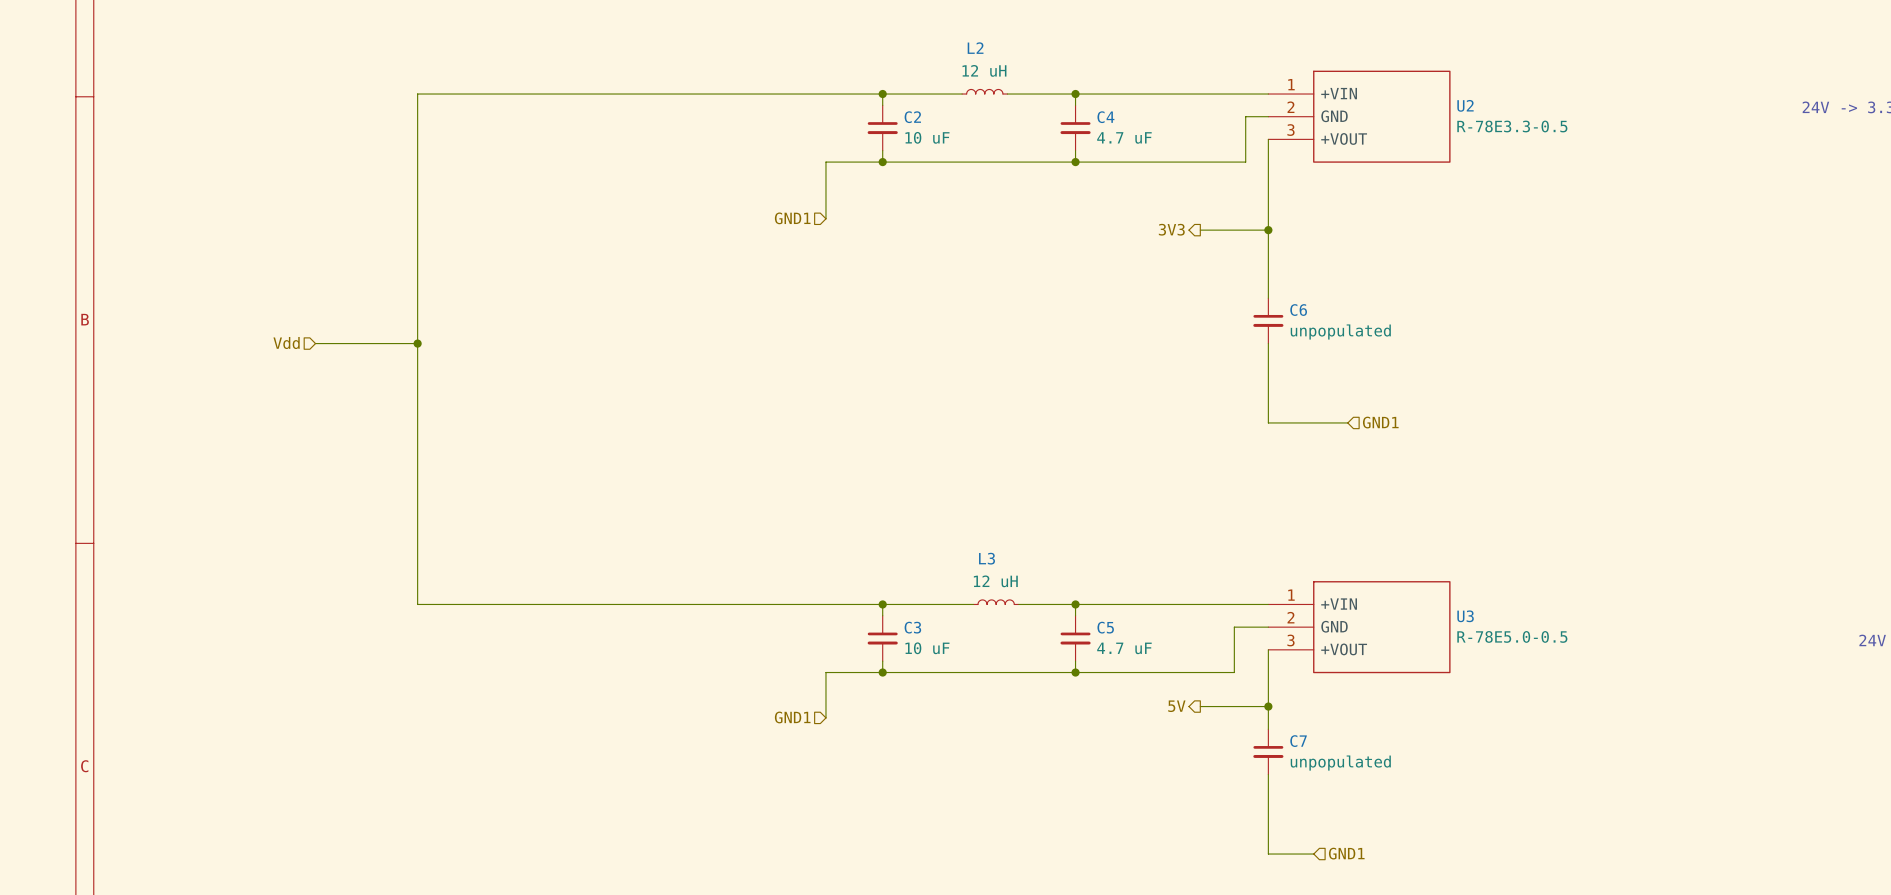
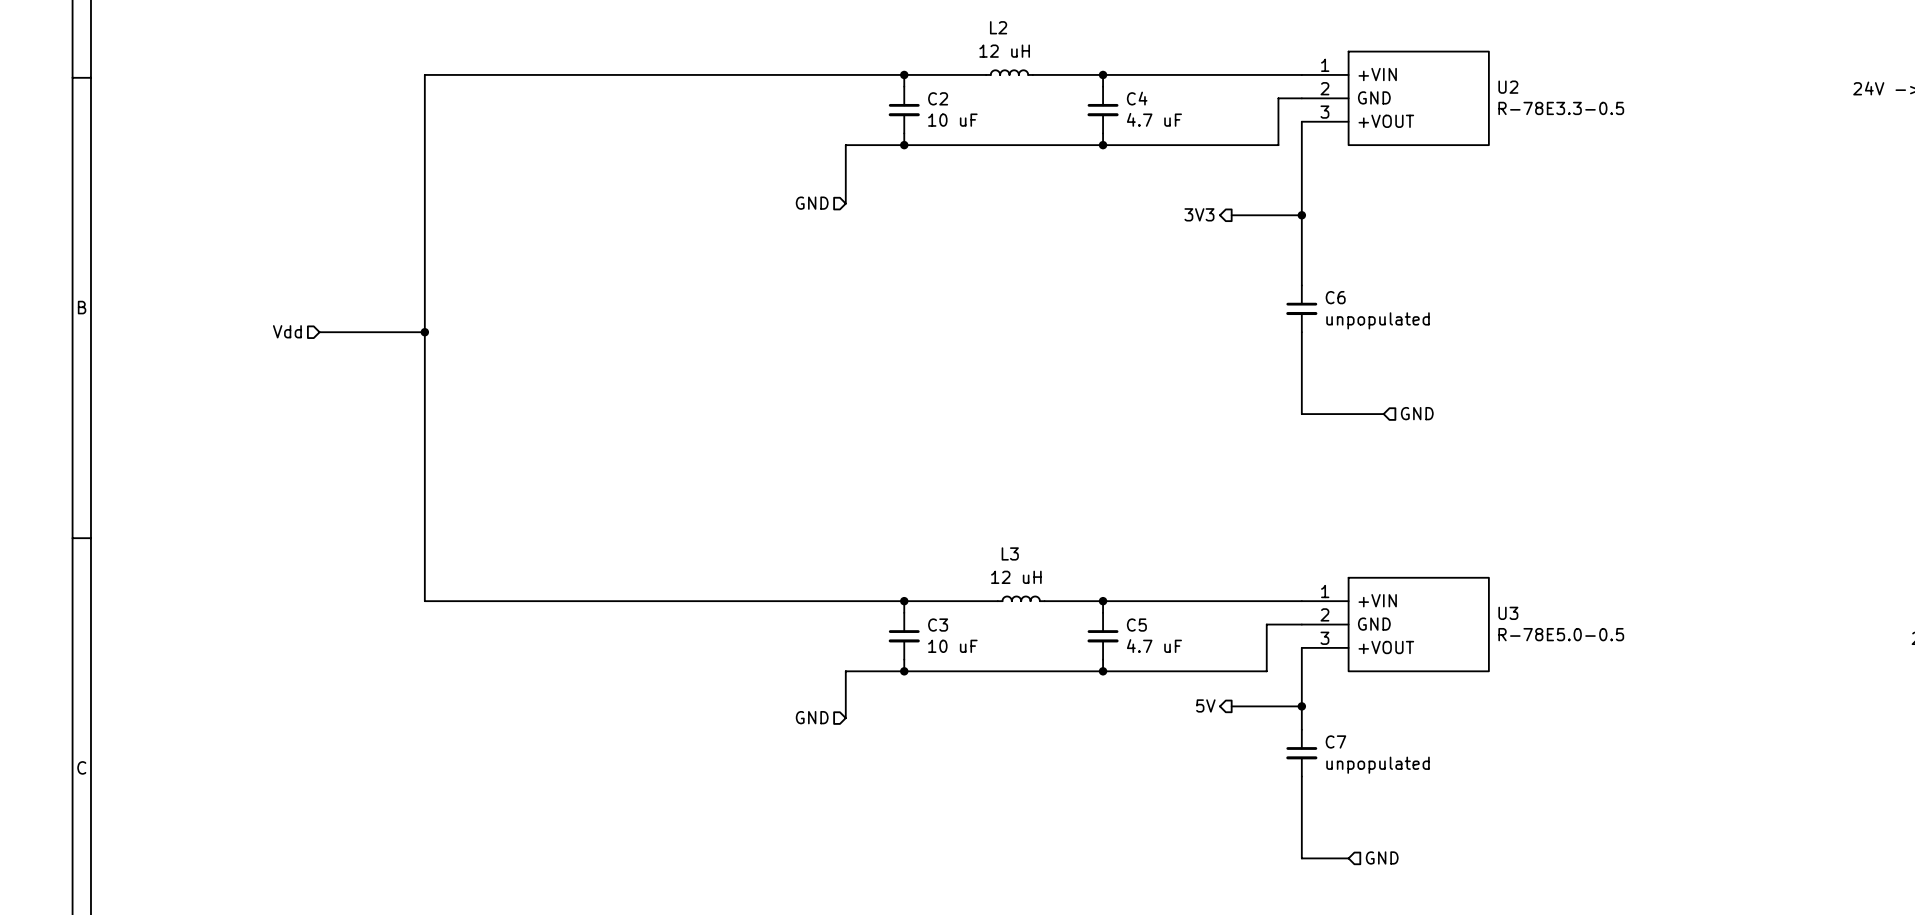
hierarchical label: GND1 (792, 218) -> GND (812, 203)
hierarchical label: GND1 (1380, 422) -> GND (1417, 413)
hierarchical label: GND1 (792, 717) -> GND (812, 717)
hierarchical label: GND1 (1346, 853) -> GND (1382, 857)

